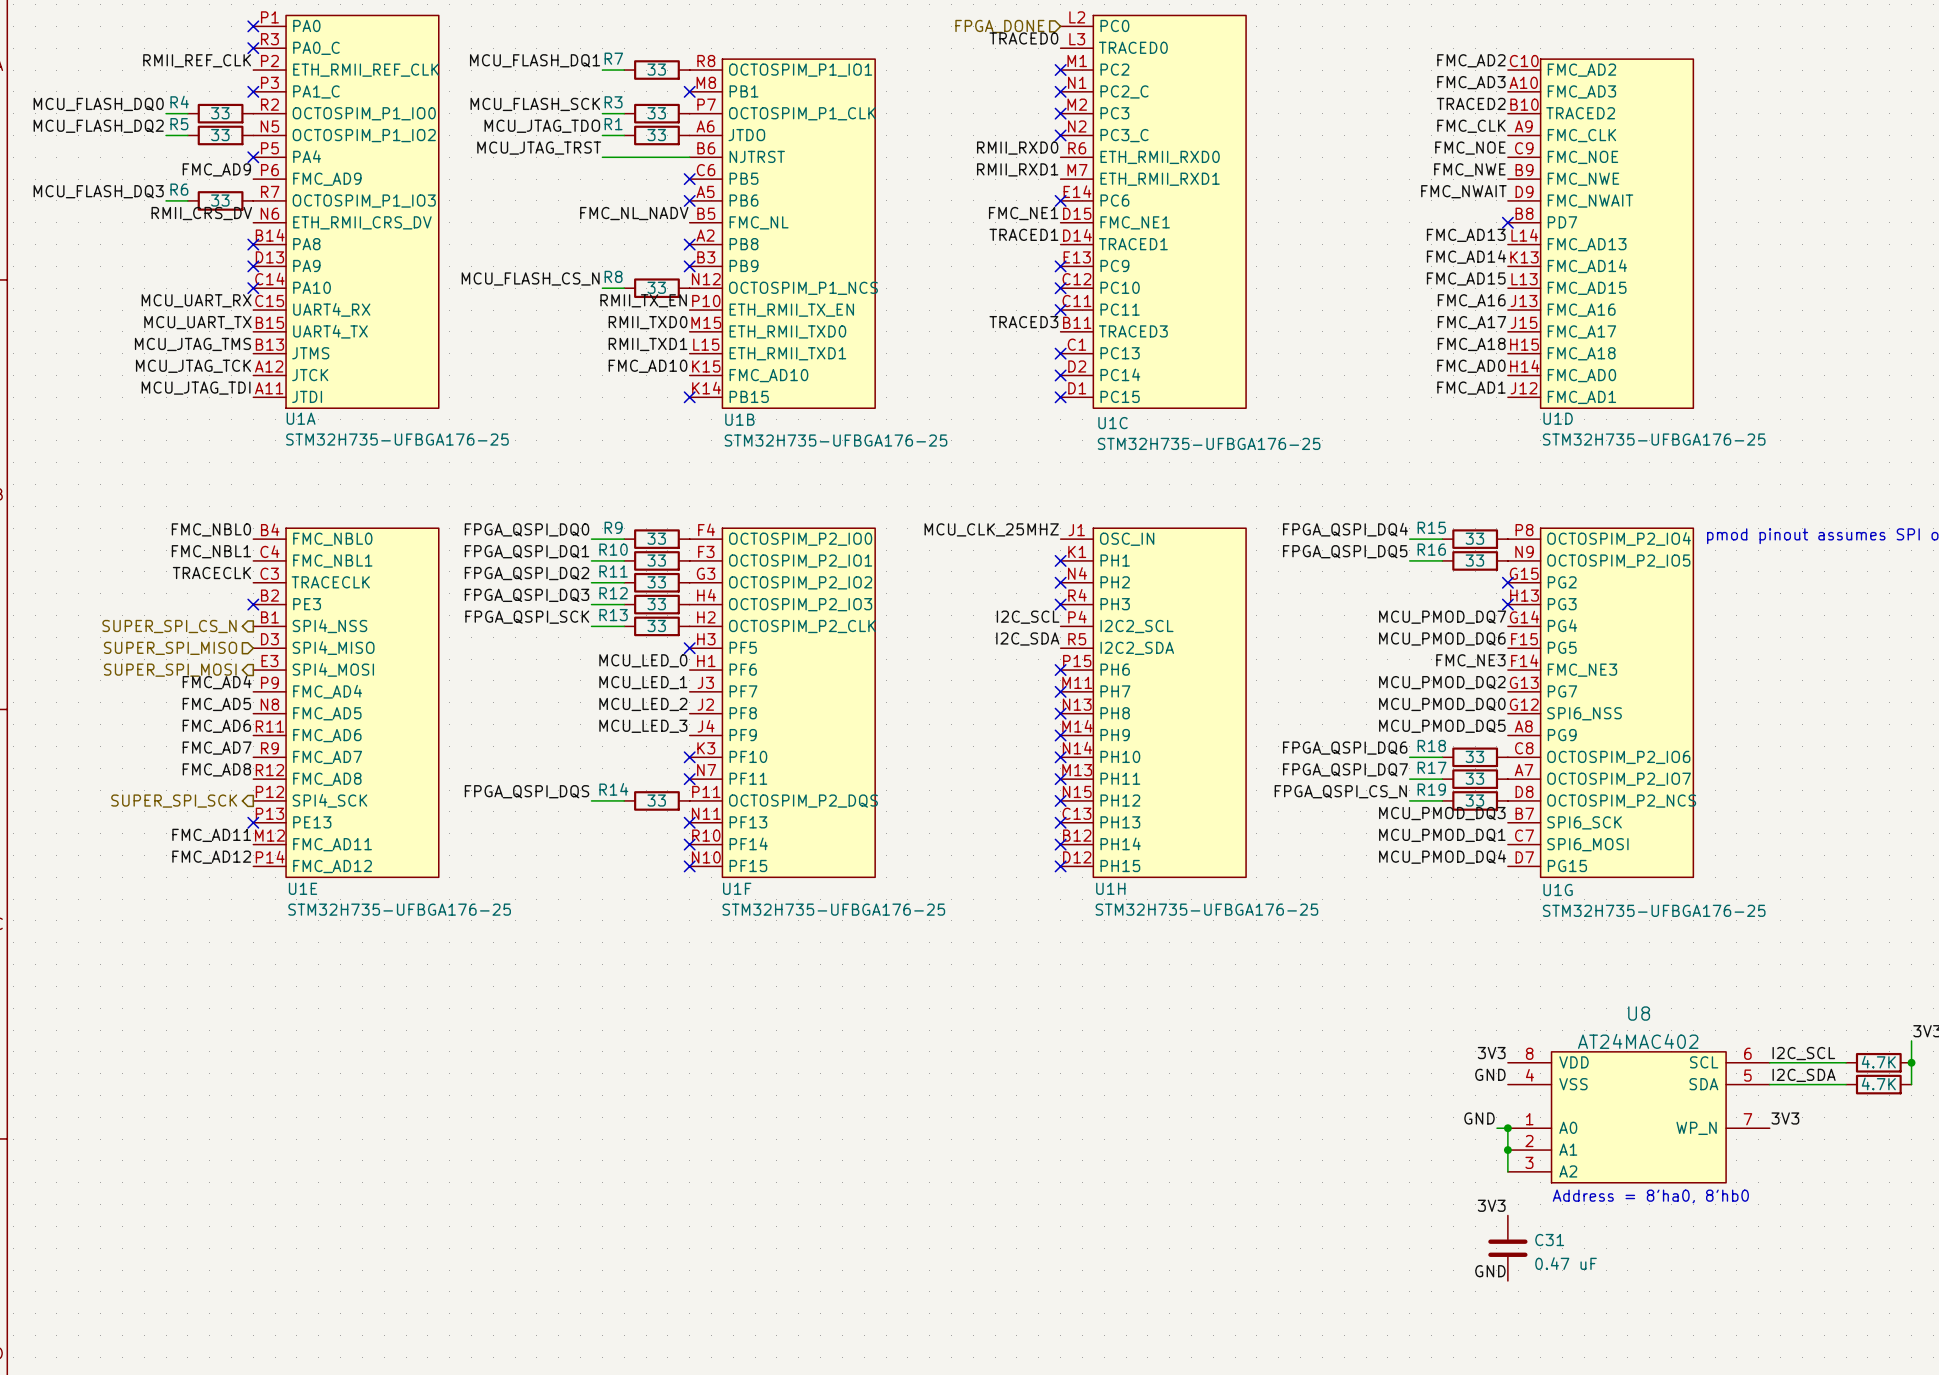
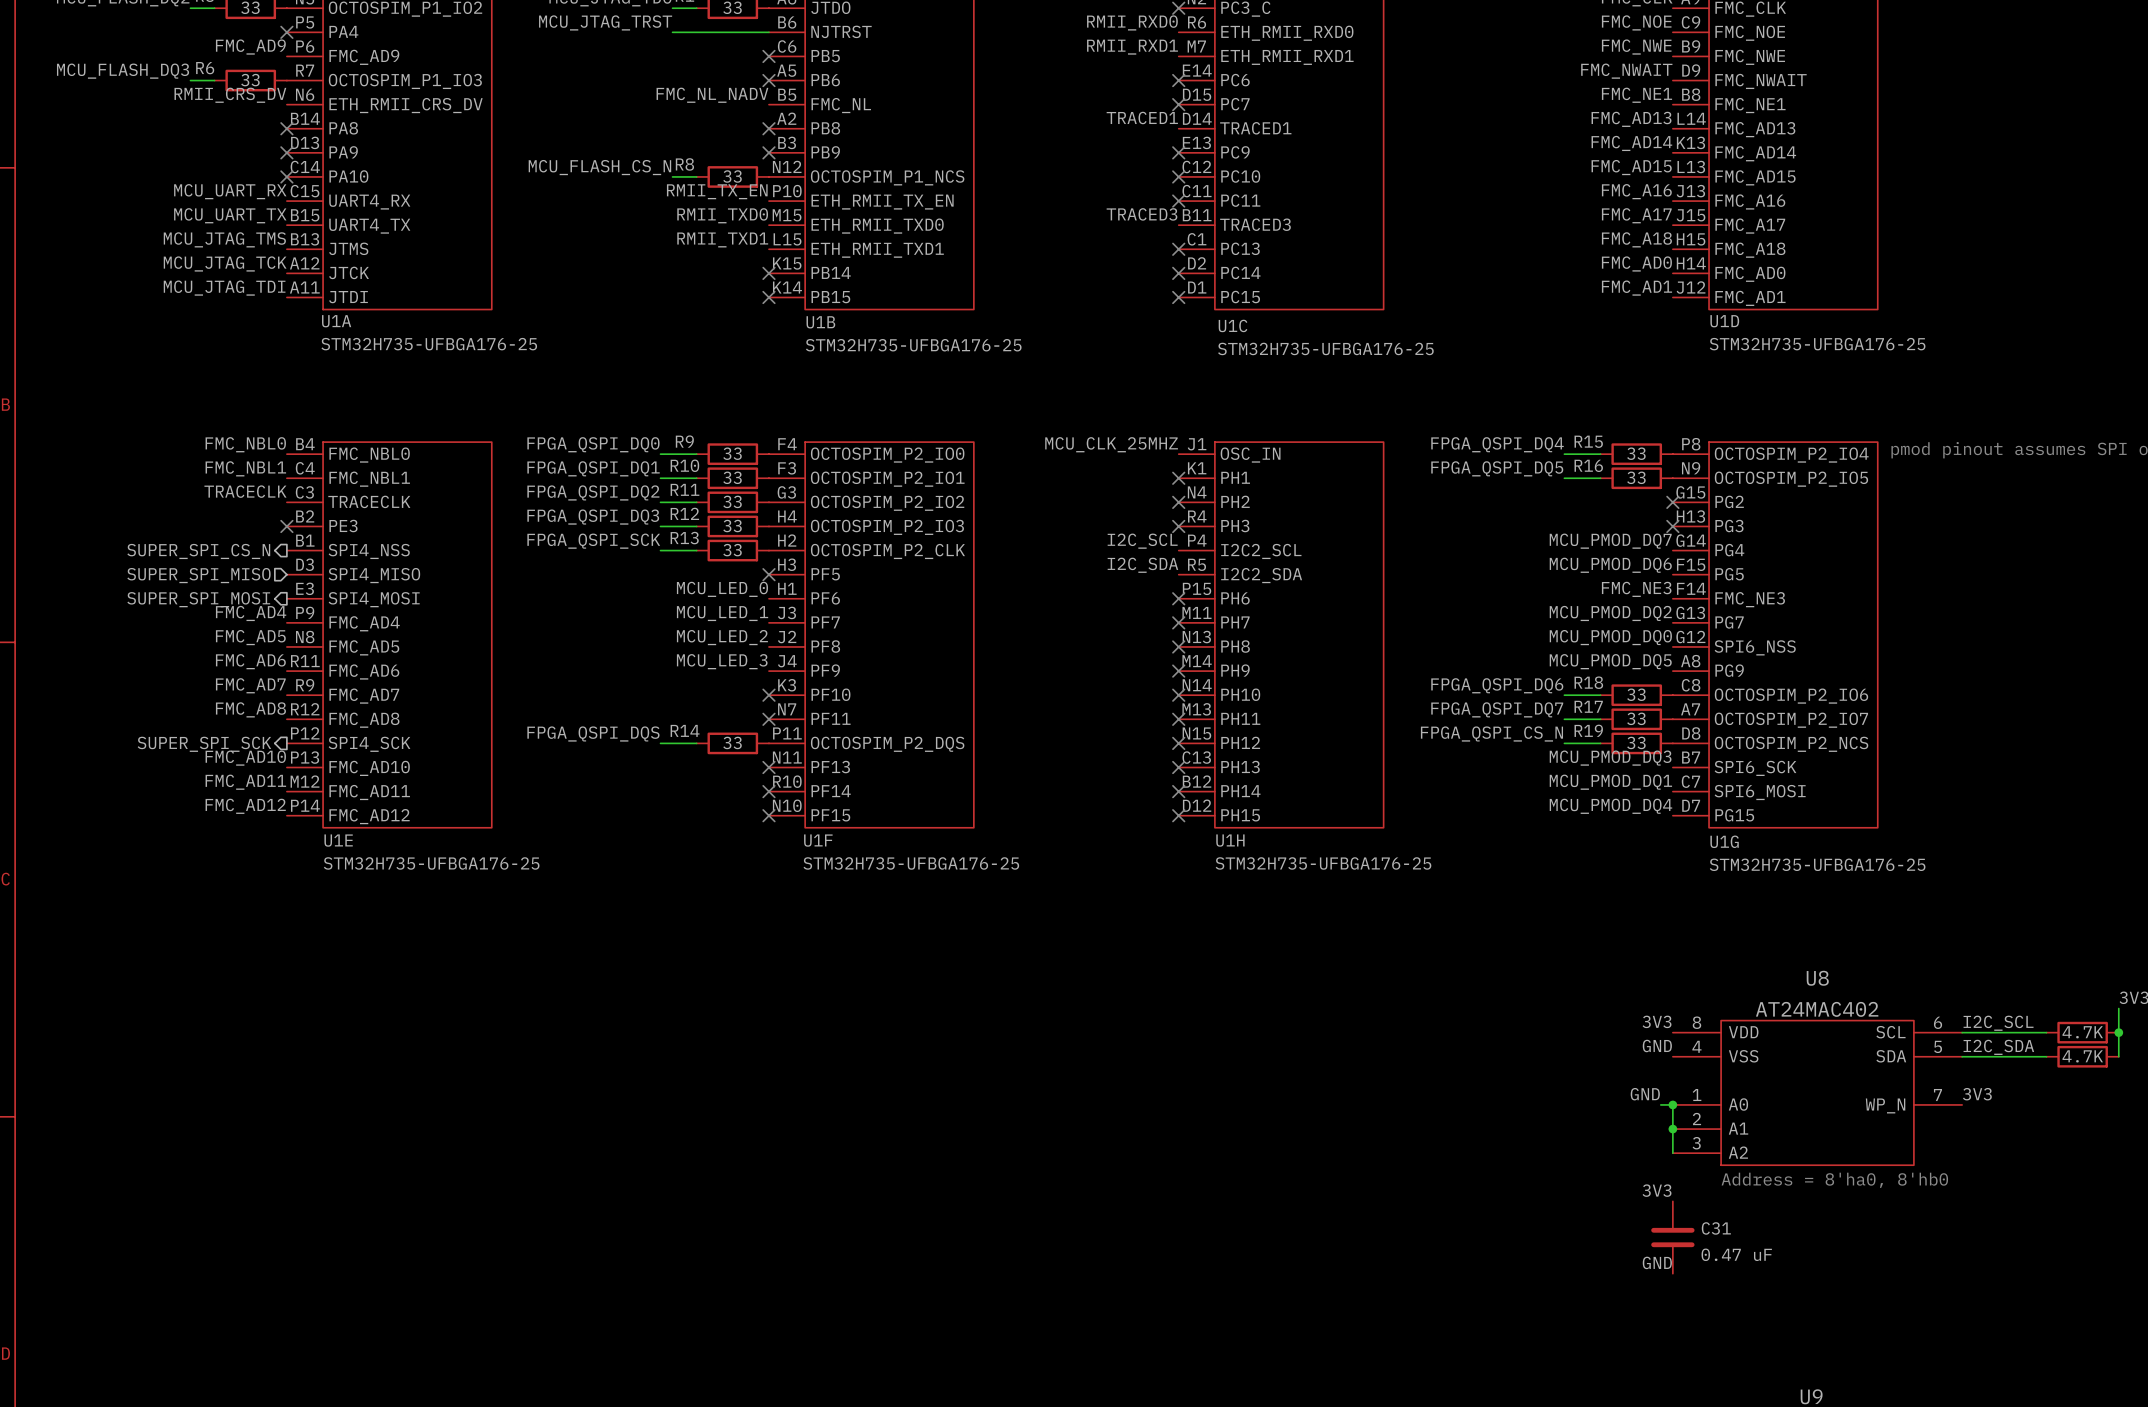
label: FMC_NE1 (1023, 213) -> none
label: none -> FMC_NE1 (1636, 95)
no-connect mark: none -> (1178, 104)
U1C pin name: FMC_NE1 (1135, 222) -> PC7 (1235, 104)
no-connect mark: (1507, 222) -> none
U1D pin name: PD7 (1562, 222) -> FMC_NE1 (1750, 105)
label: FMC_AD10 (648, 366) -> none
no-connect mark: none -> (768, 273)
U1B pin name: FMC_AD10 (768, 375) -> PB14 (831, 272)
label: none -> FMC_AD10 (245, 758)
no-connect mark: (253, 822) -> none
U1E pin name: PE13 (312, 822) -> FMC_AD10 (369, 768)

